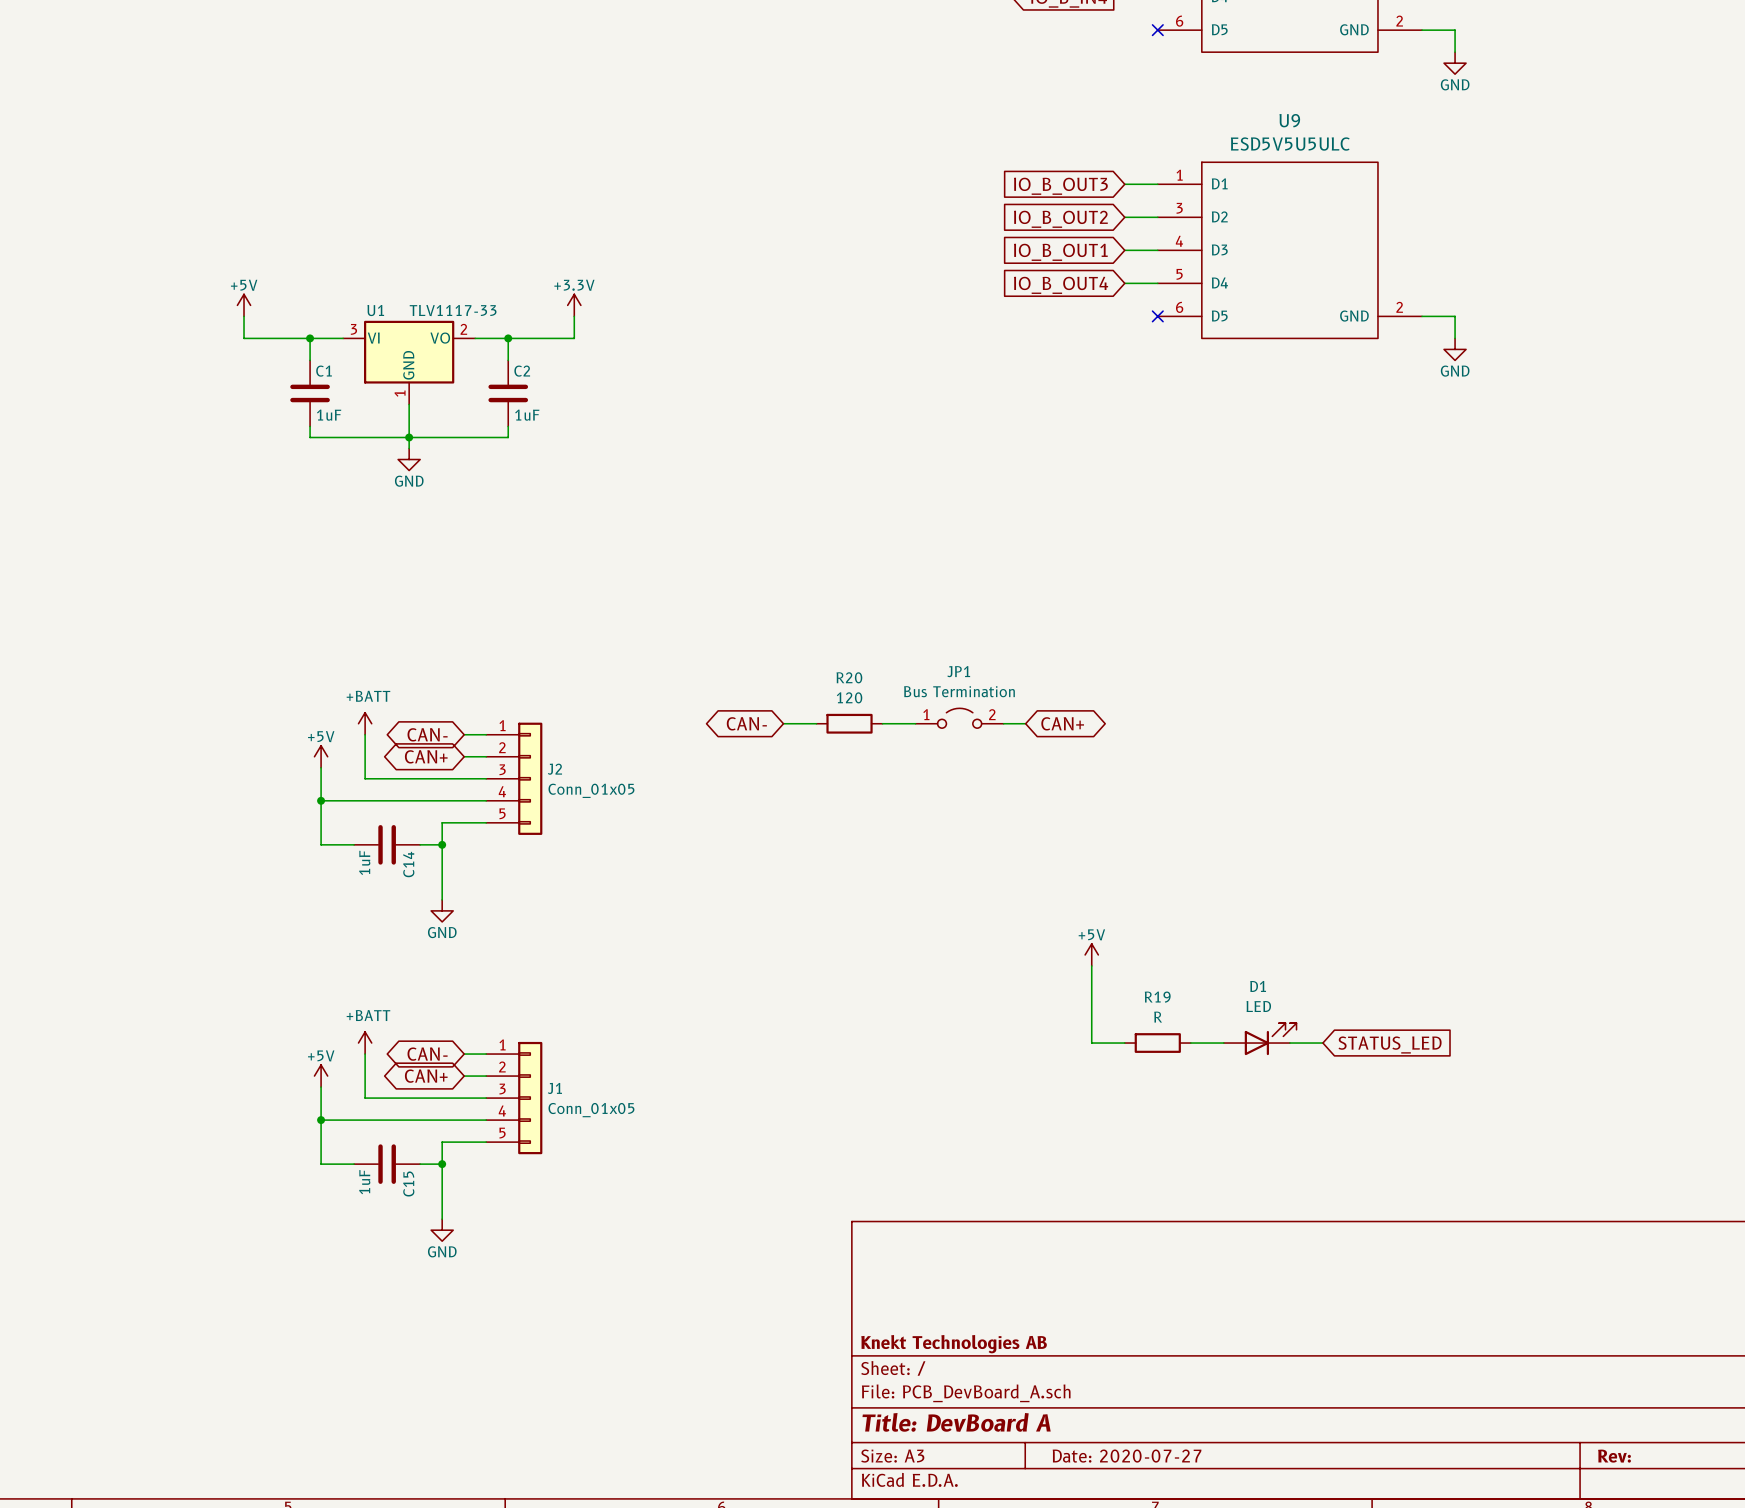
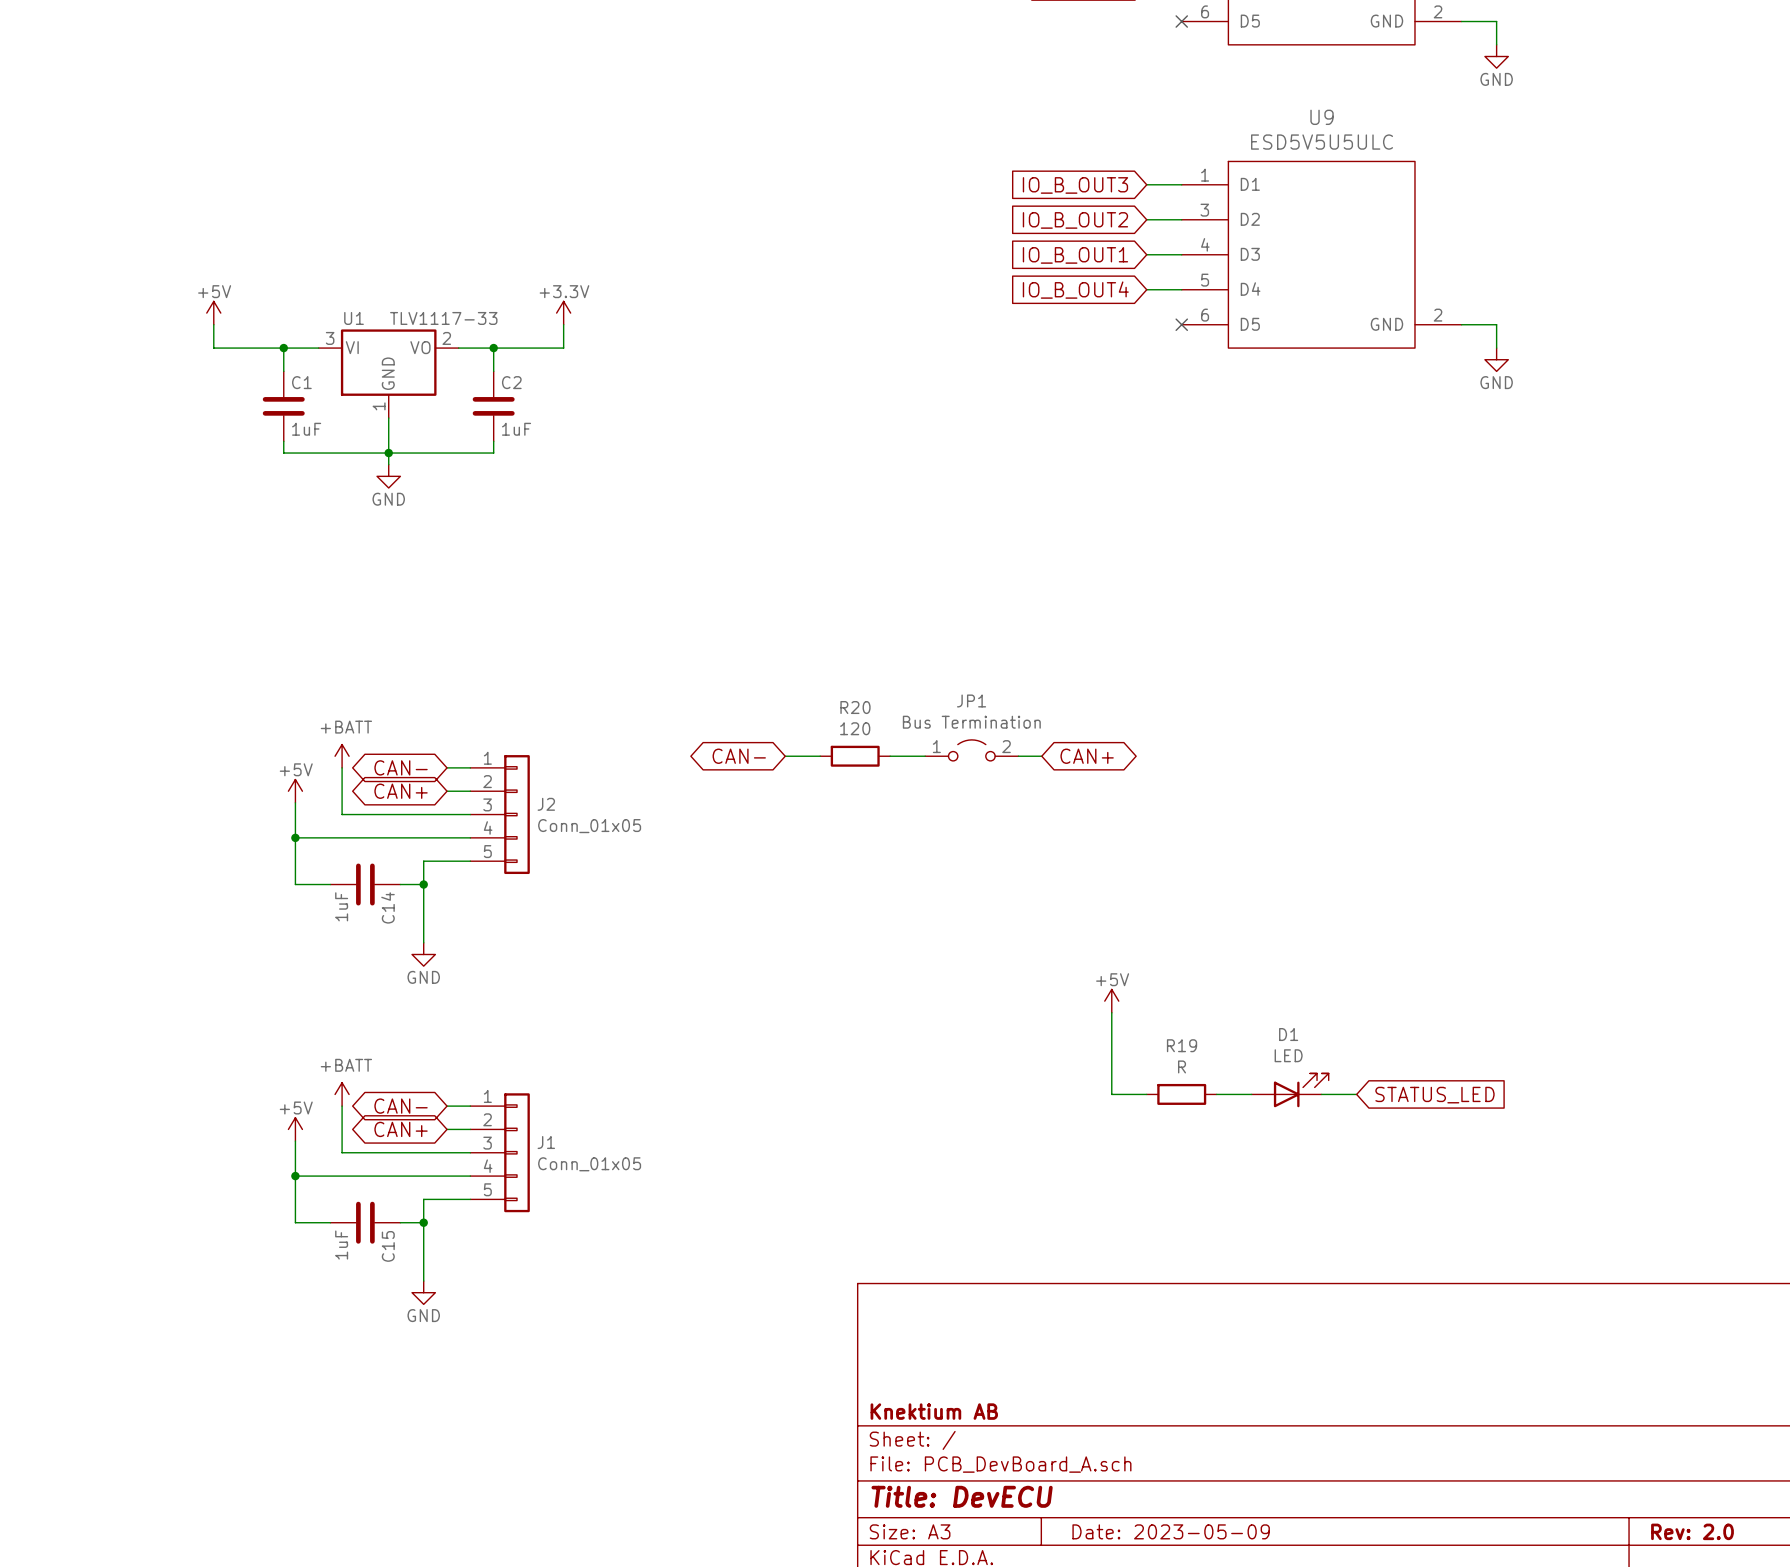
title block: Knekt Technologies AB (954, 1344) -> Knektium AB (934, 1411)
title block: Title: DevBoard A (956, 1422) -> Title: DevECU (962, 1496)
title block: Date: 2020-07-27 (1127, 1456) -> Date: 2023-05-09 (1171, 1531)
title block: Rev: (1614, 1456) -> Rev: 2.0 (1692, 1531)

